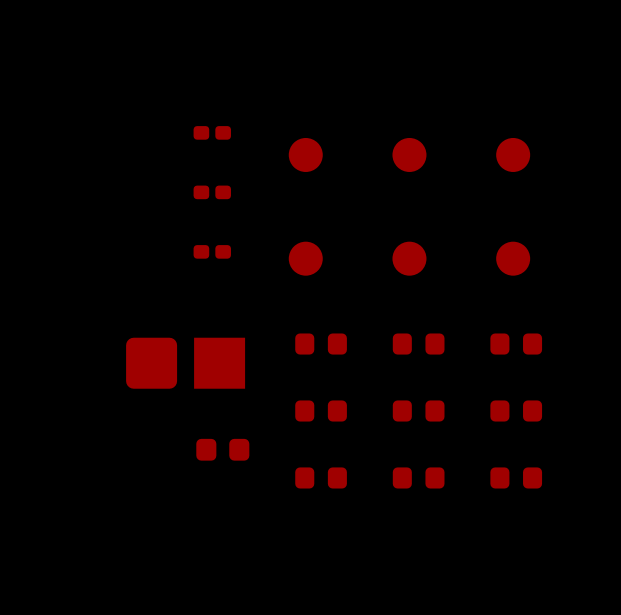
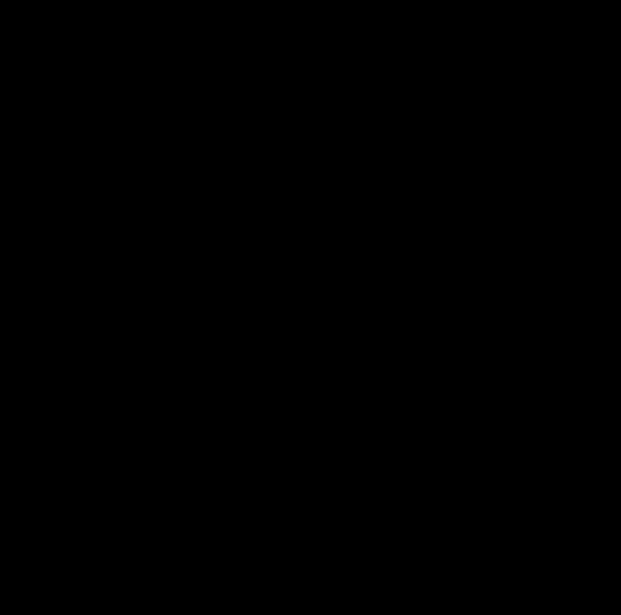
part: (212, 132) -> none
part: (305, 154) -> none
part: (409, 154) -> none
part: (513, 154) -> none
part: (212, 192) -> none
part: (212, 251) -> none
part: (305, 258) -> none
part: (409, 258) -> none
part: (513, 258) -> none
part: (321, 344) -> none
part: (418, 344) -> none
part: (516, 344) -> none
part: (185, 363) -> none
part: (321, 410) -> none
part: (418, 410) -> none
part: (516, 410) -> none
part: (222, 449) -> none
part: (321, 477) -> none
part: (418, 477) -> none
part: (516, 477) -> none

